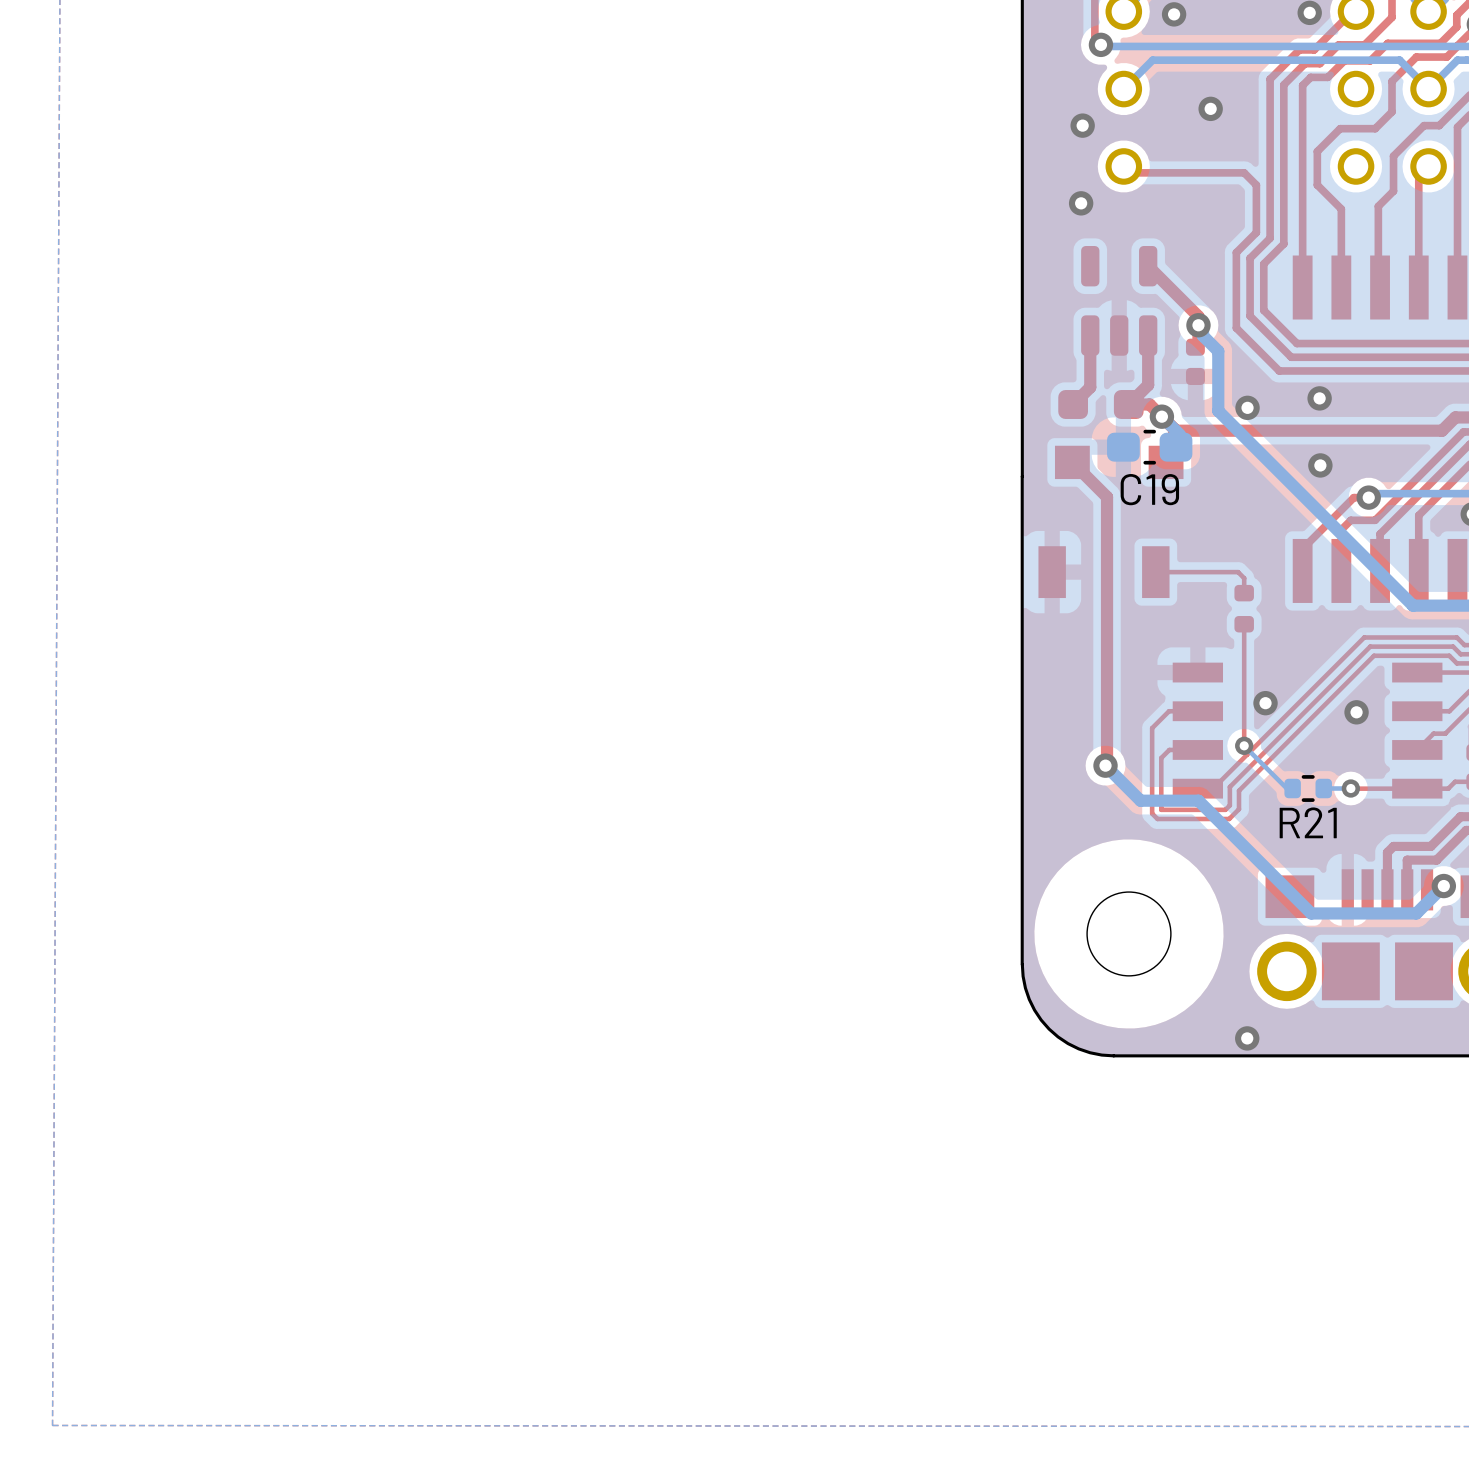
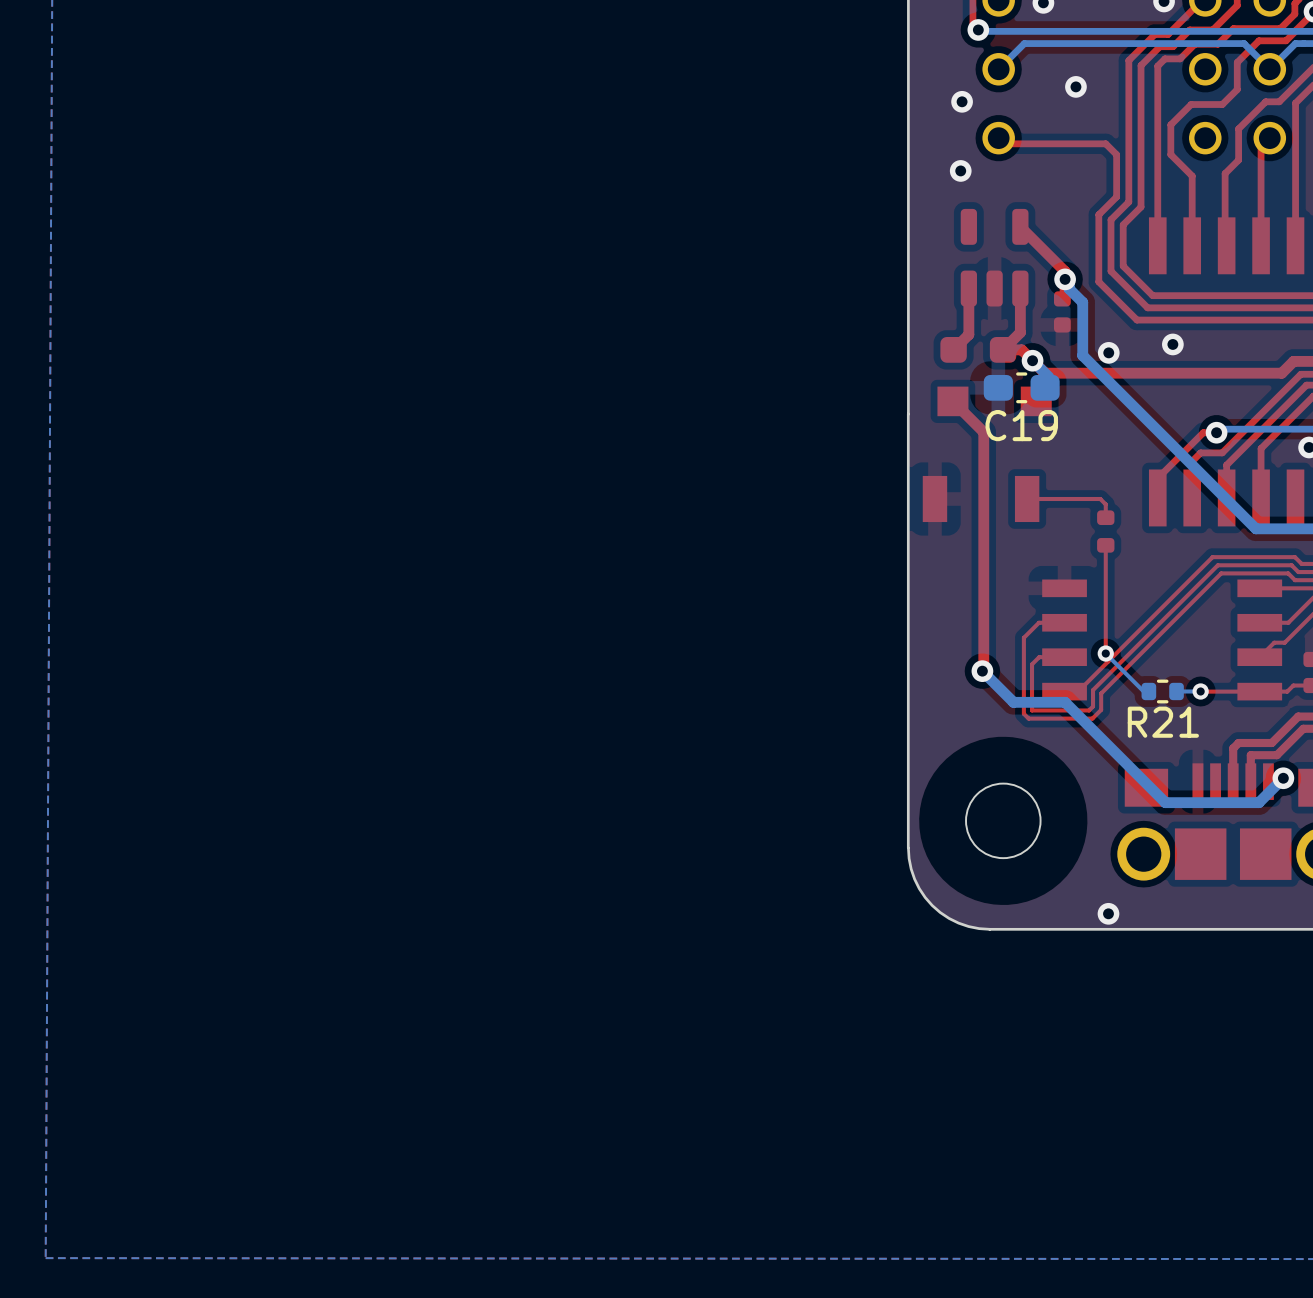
via: (1320, 465) -> none
via: (1265, 703) -> none
via: (1356, 712) -> none

